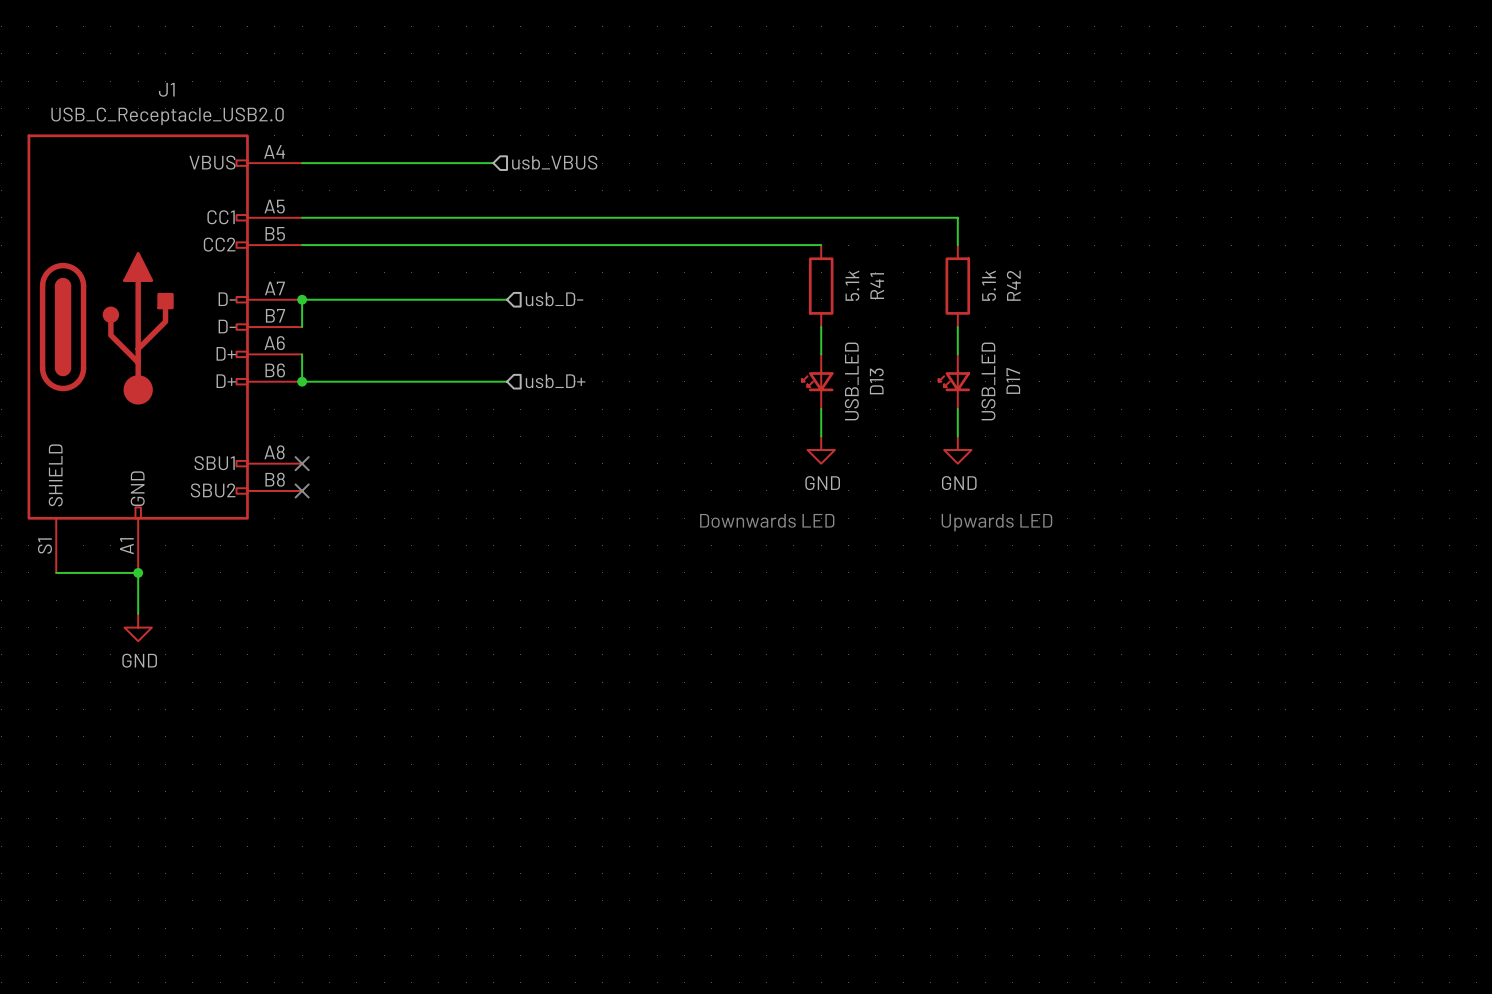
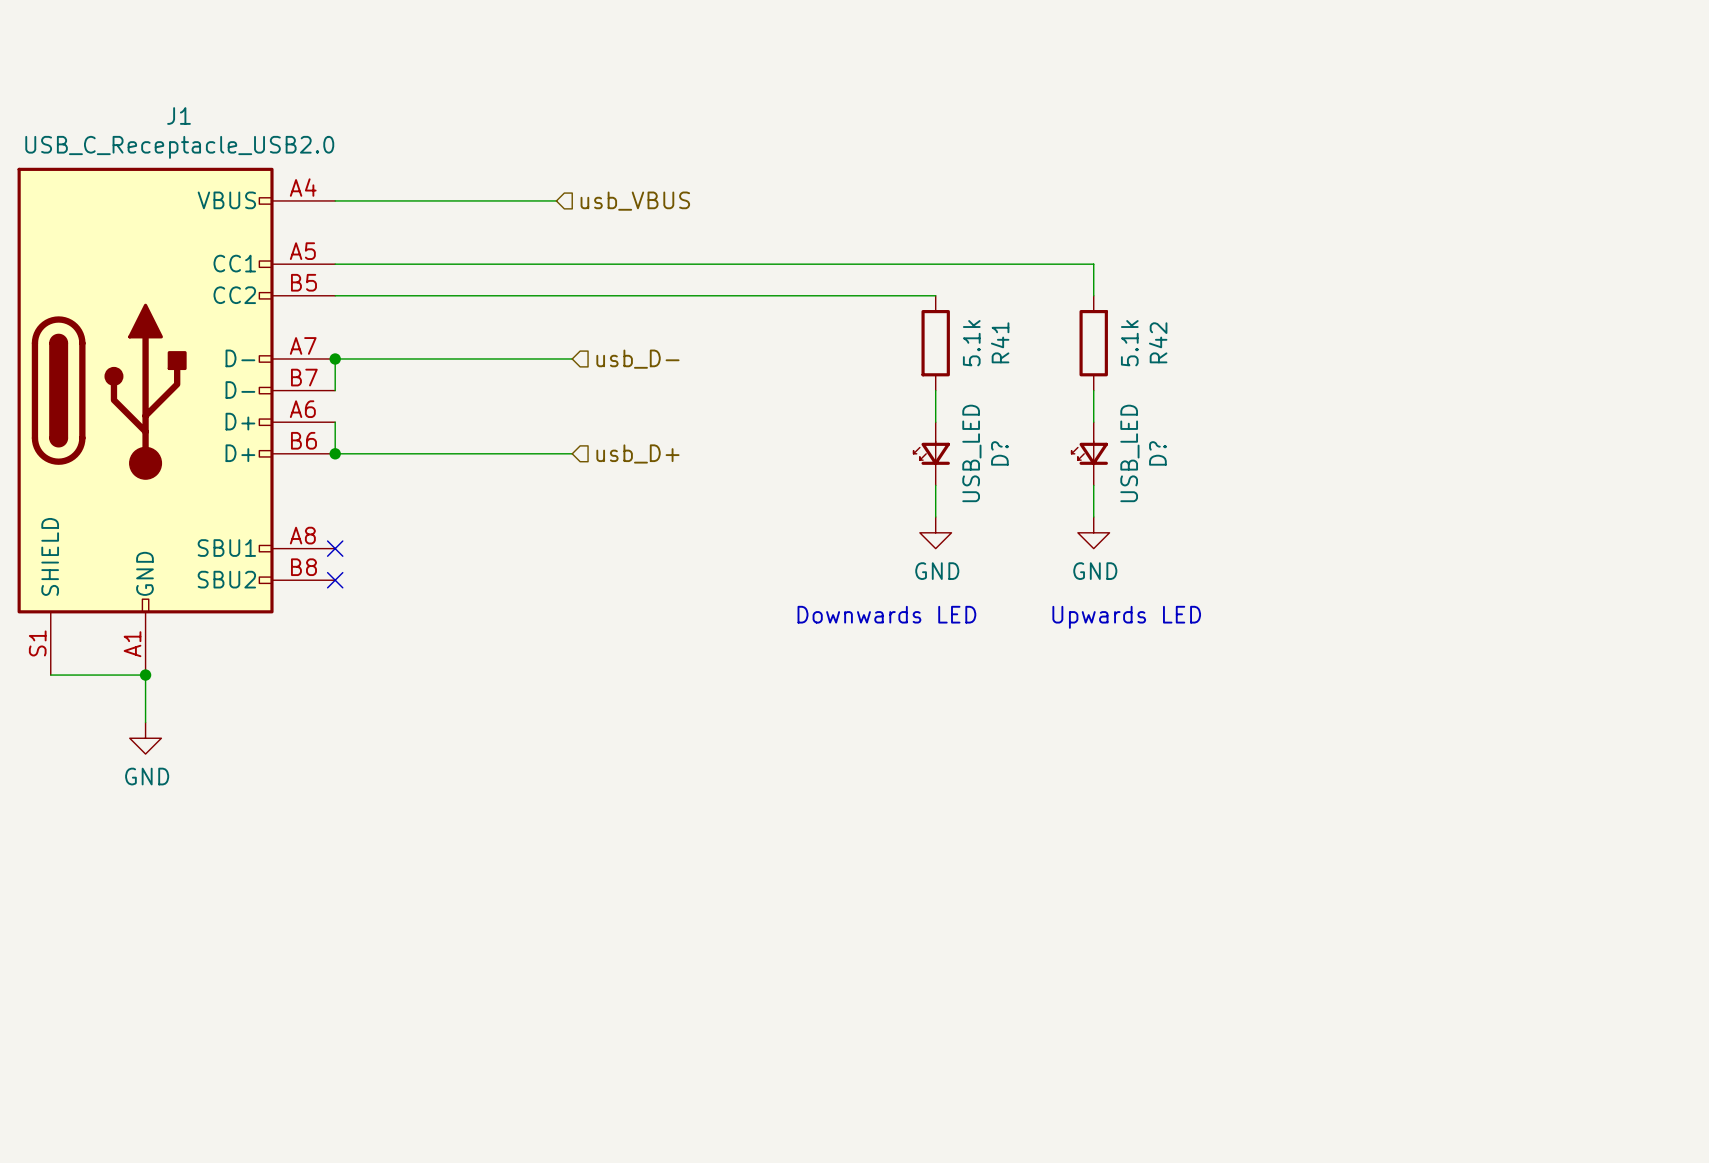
D17 name: D17 (1013, 380) -> D? (1157, 453)
D13 name: D13 (876, 381) -> D? (999, 453)

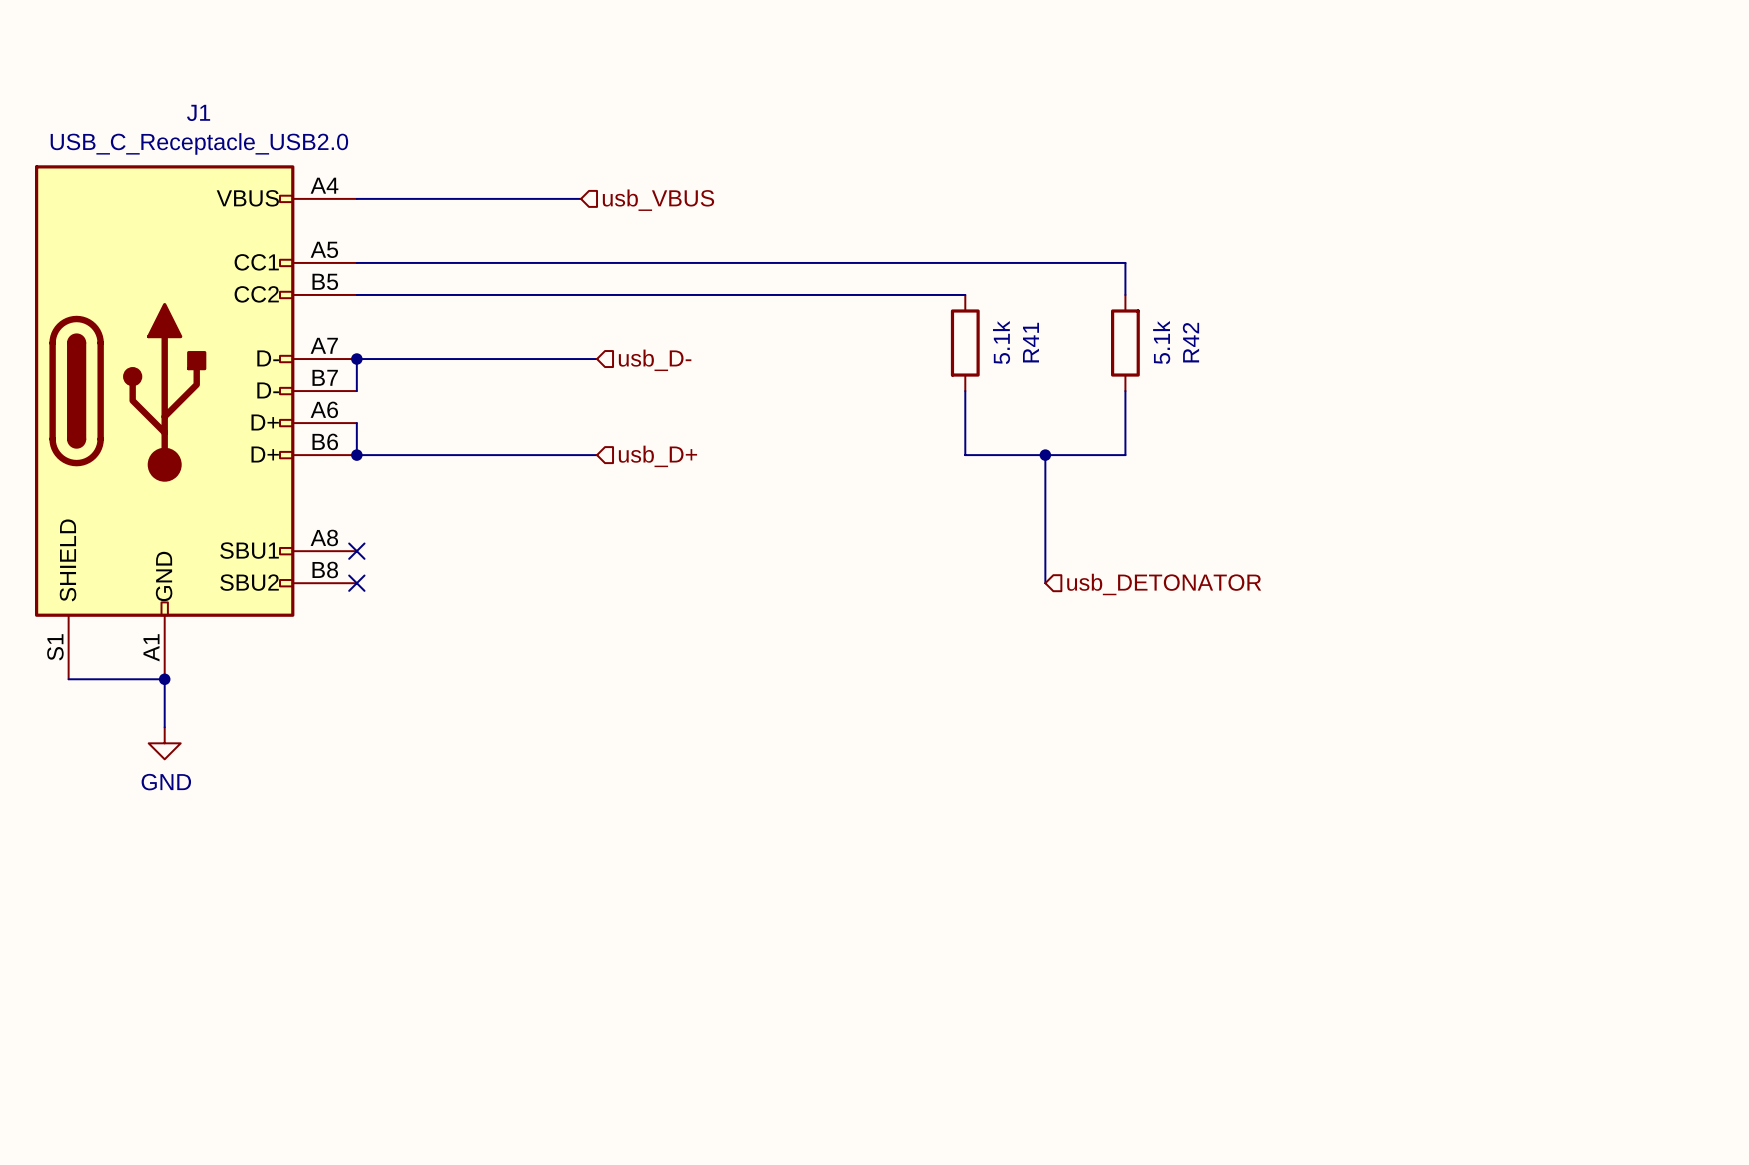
wire: none -> (965, 423) (965, 455) (1125, 455) (1125, 423)
D?: USB_LED (931, 453) -> none
wire: none -> (1045, 455) (1045, 583)
junction: none -> (1045, 455)
D?: USB_LED (1089, 453) -> none
wire: (935, 485) (935, 517) -> none
wire: (1093, 485) (1093, 517) -> none
power symbol: GND (935, 532) -> none
power symbol: GND (1093, 532) -> none
hierarchical label: none -> usb_DETONATOR (1164, 584)
text: Downwards LED (886, 614) -> none
text: Upwards LED (1126, 617) -> none

